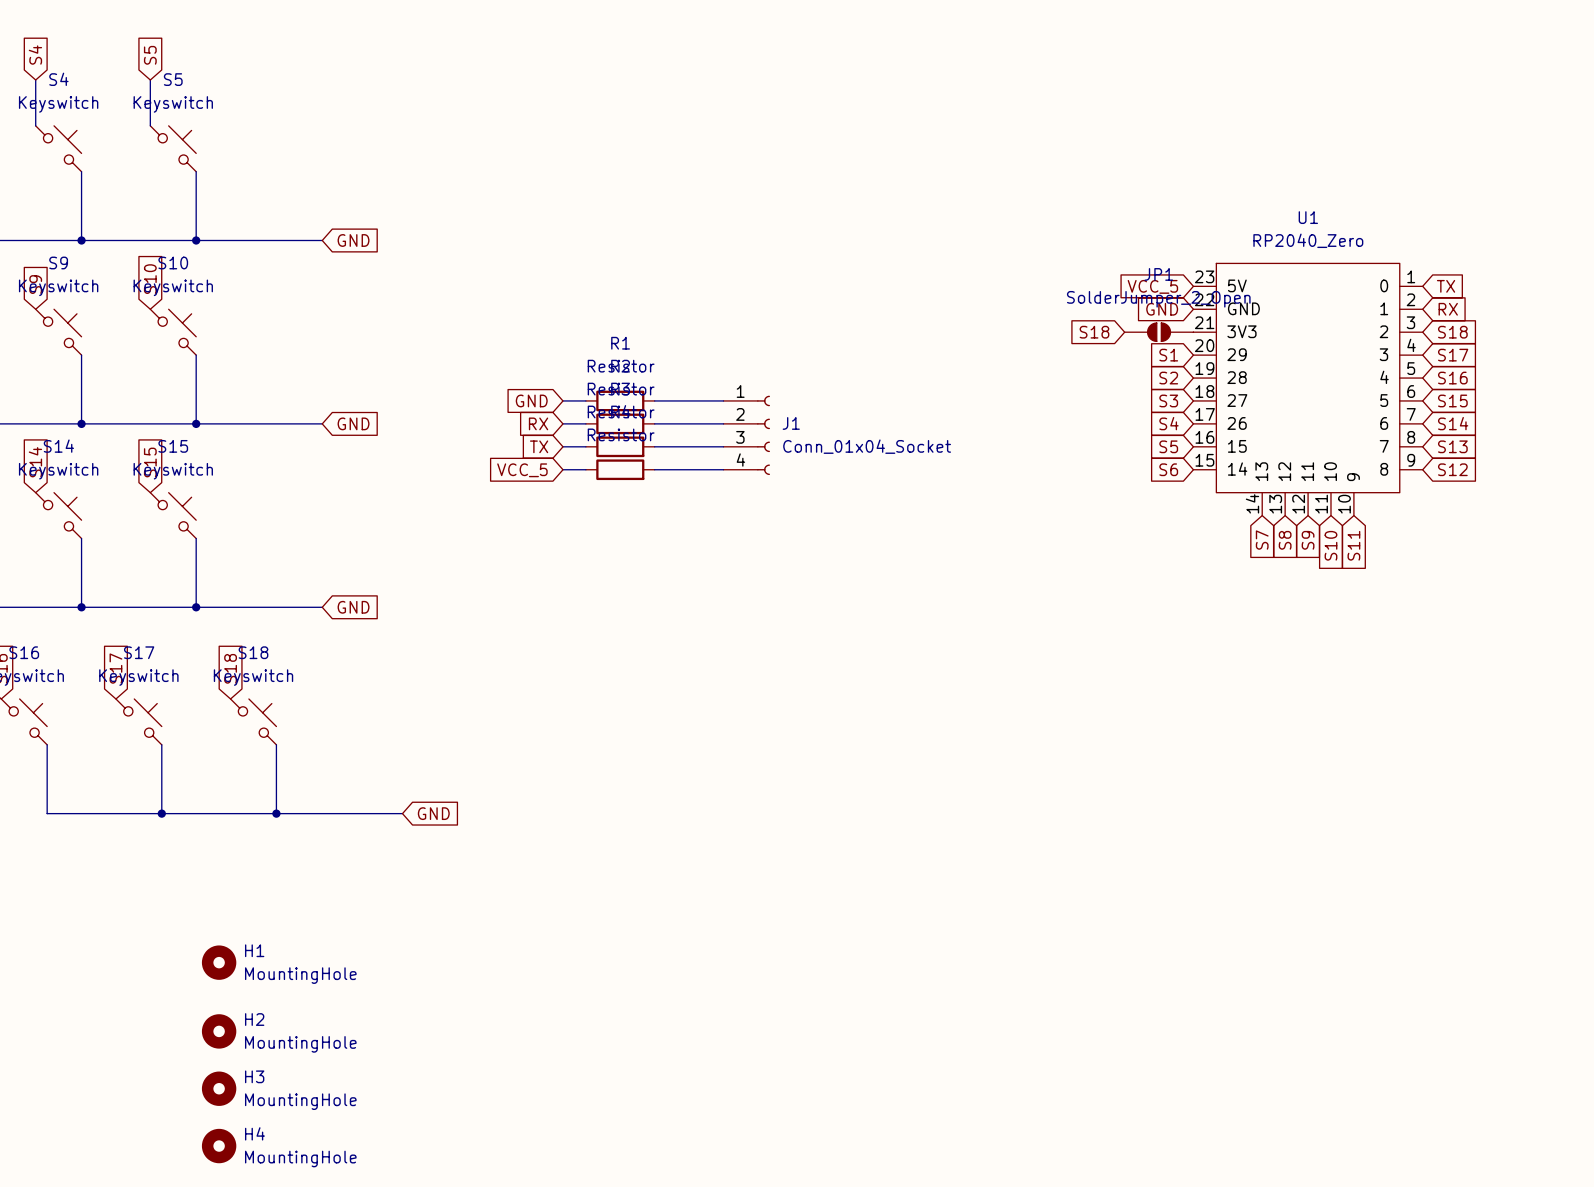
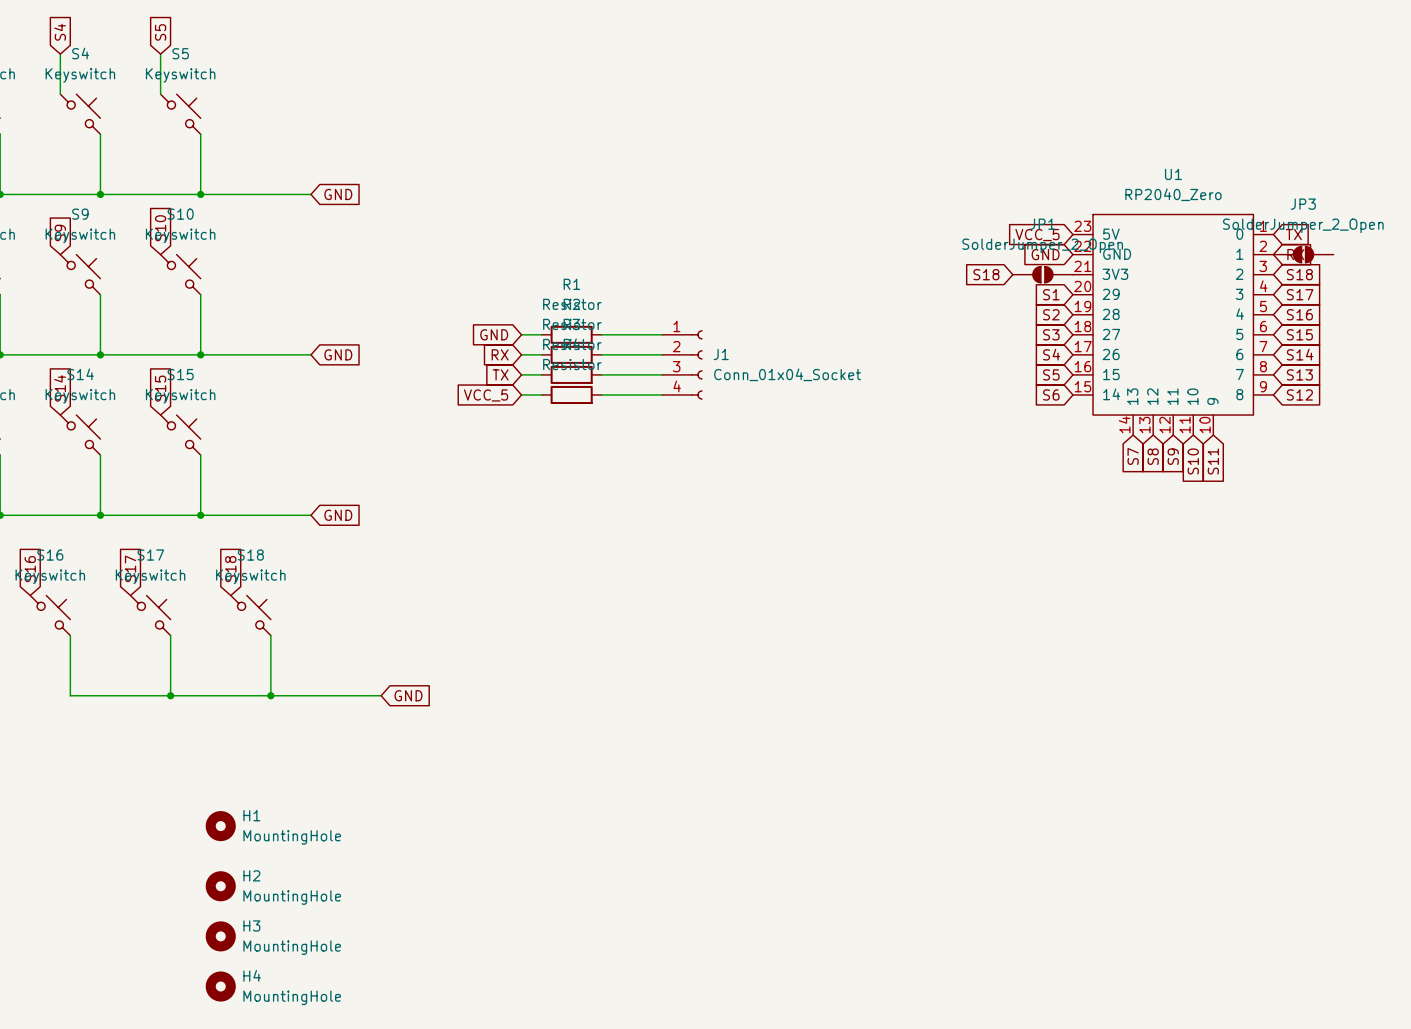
JP3: none -> SolderJumper_2_Open (1303, 254)

